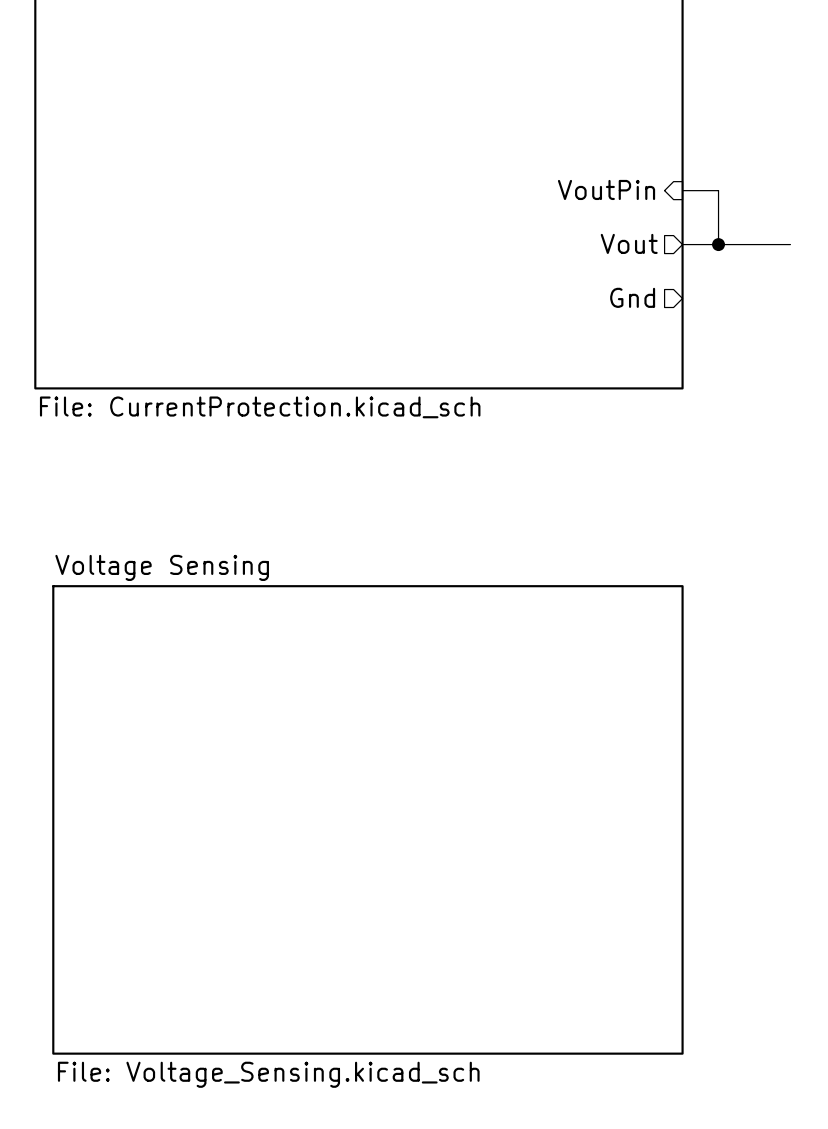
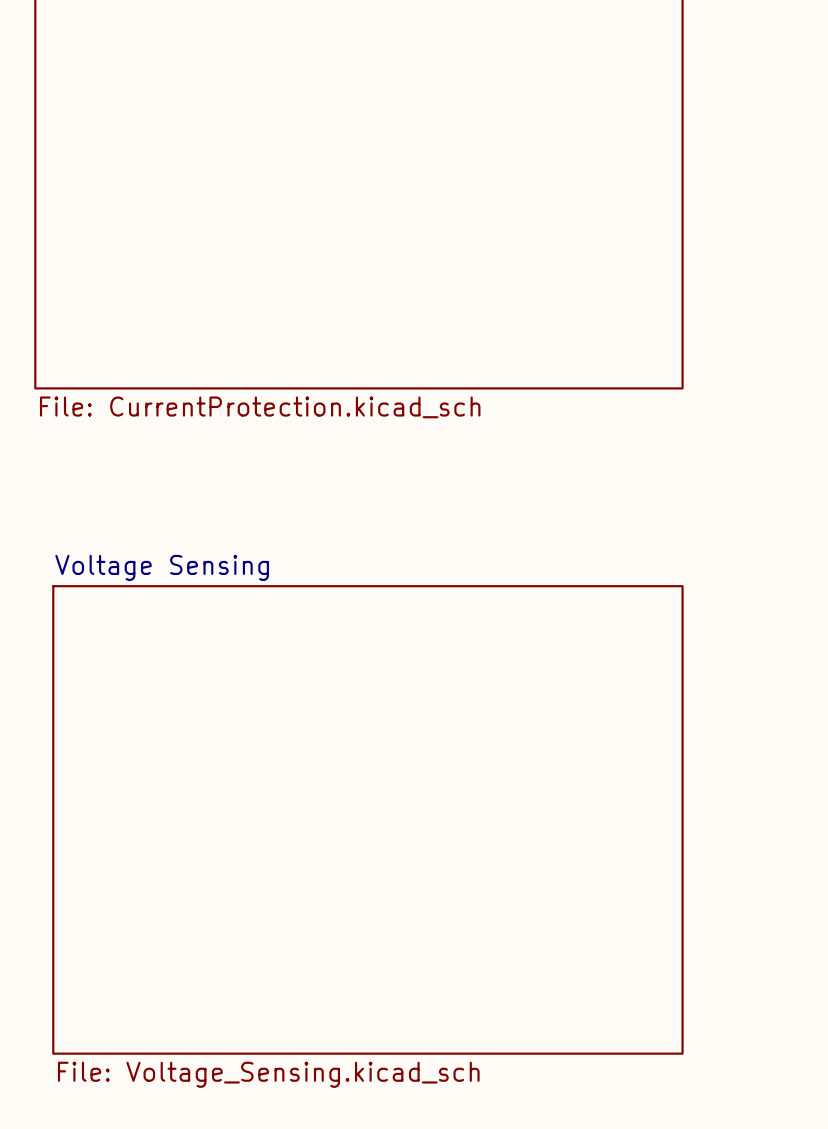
sheet pin: VoutPin (606, 189) -> none
wire: (682, 190) (718, 190) (718, 244) -> none
sheet pin: Vout (629, 243) -> none
wire: (682, 244) (790, 244) -> none
junction: (718, 244) -> none
sheet pin: Gnd (632, 297) -> none

